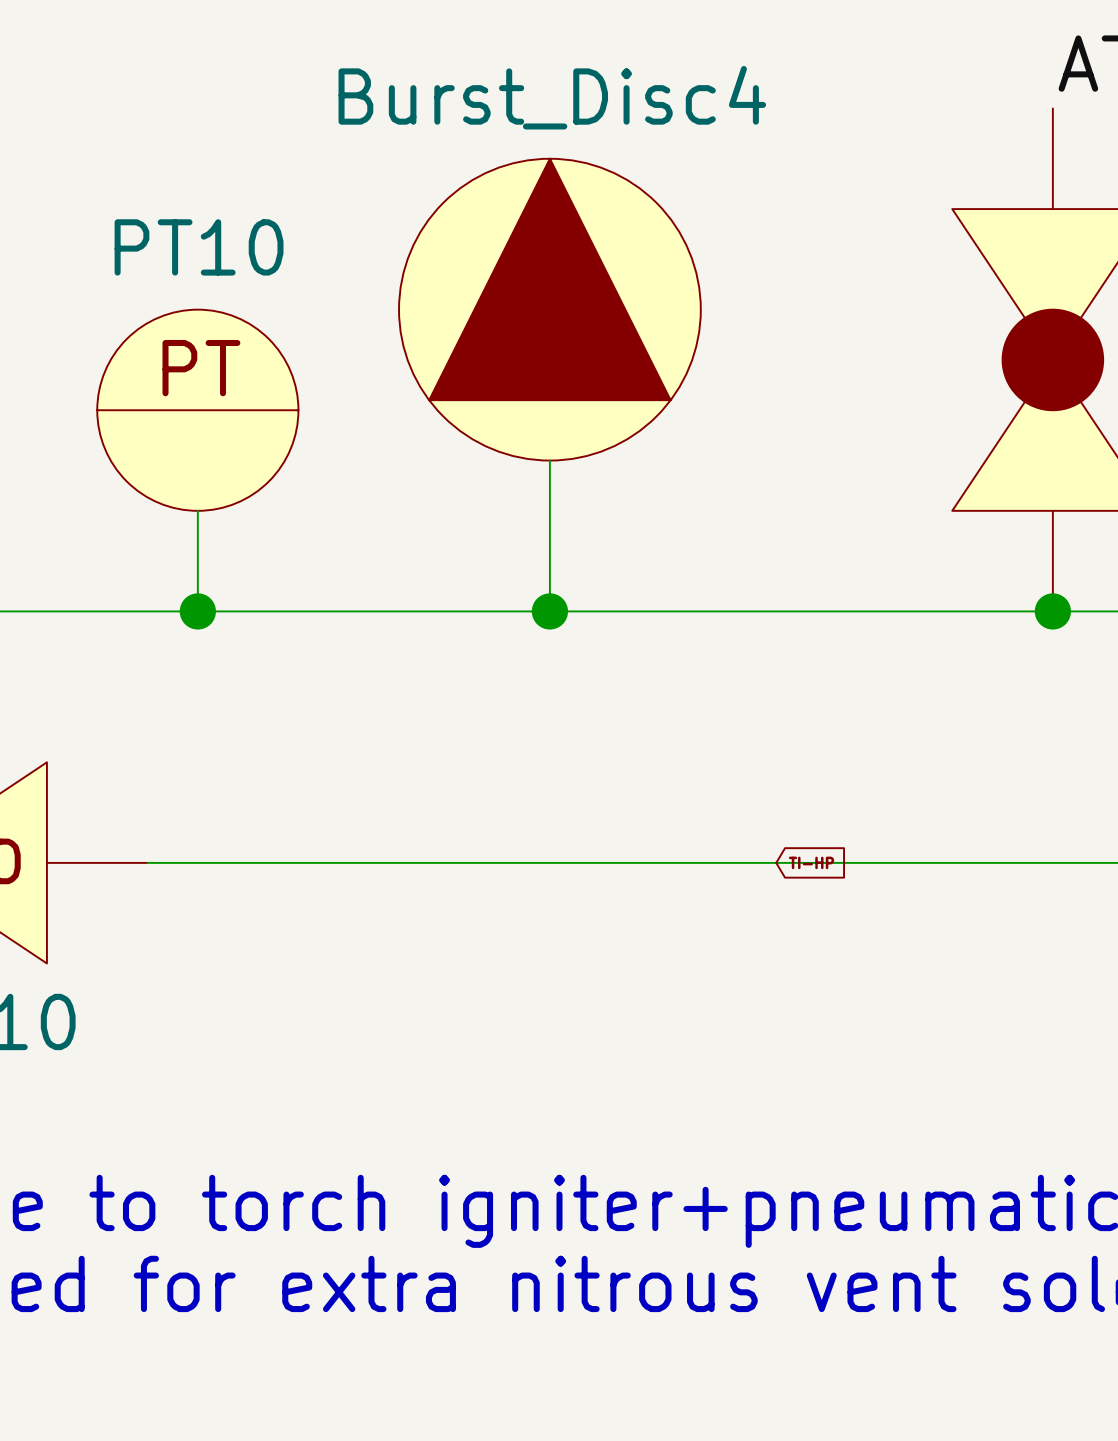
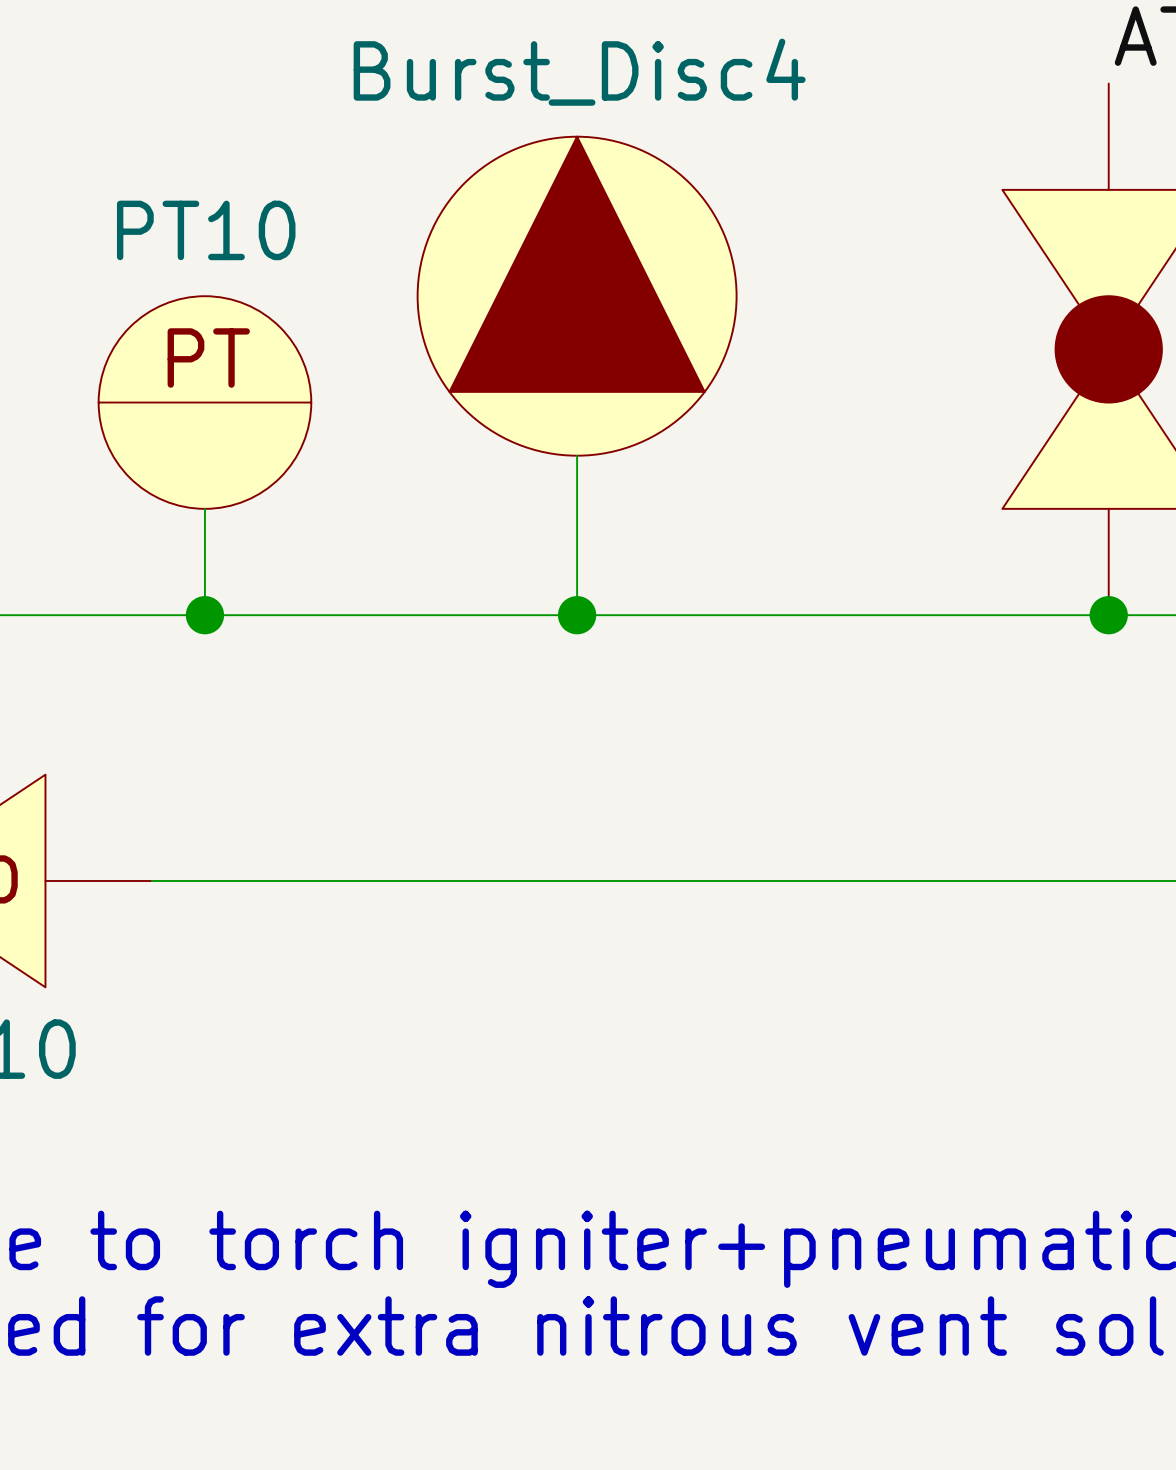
global label: TI-HP (811, 862) -> none

